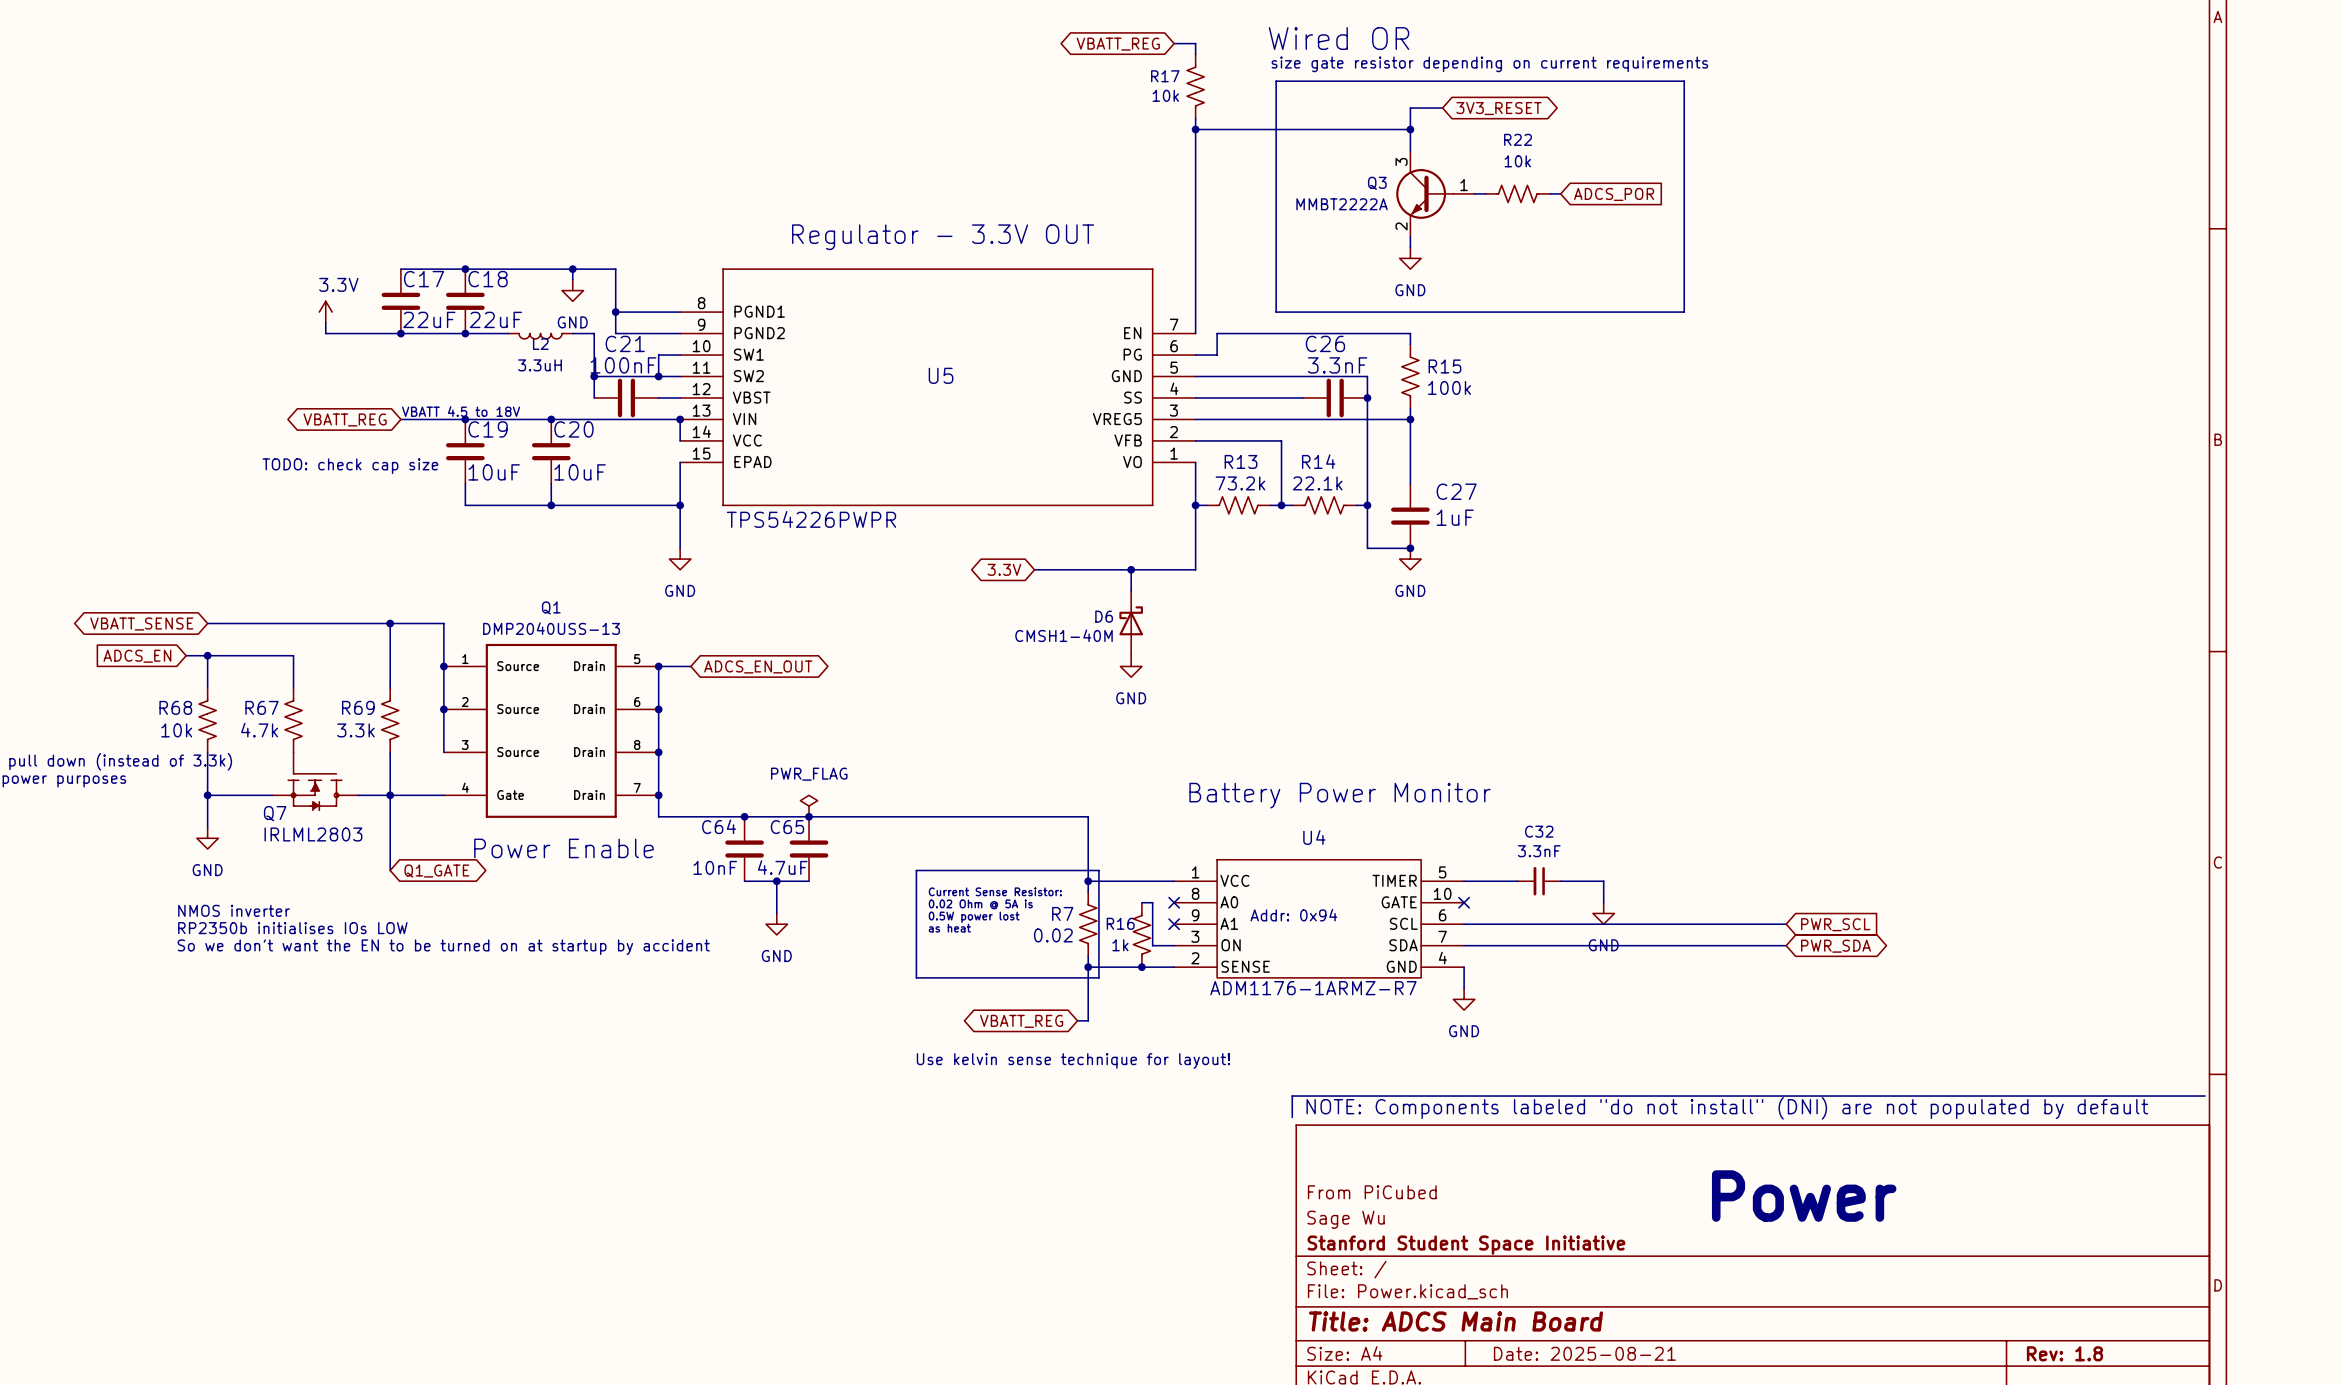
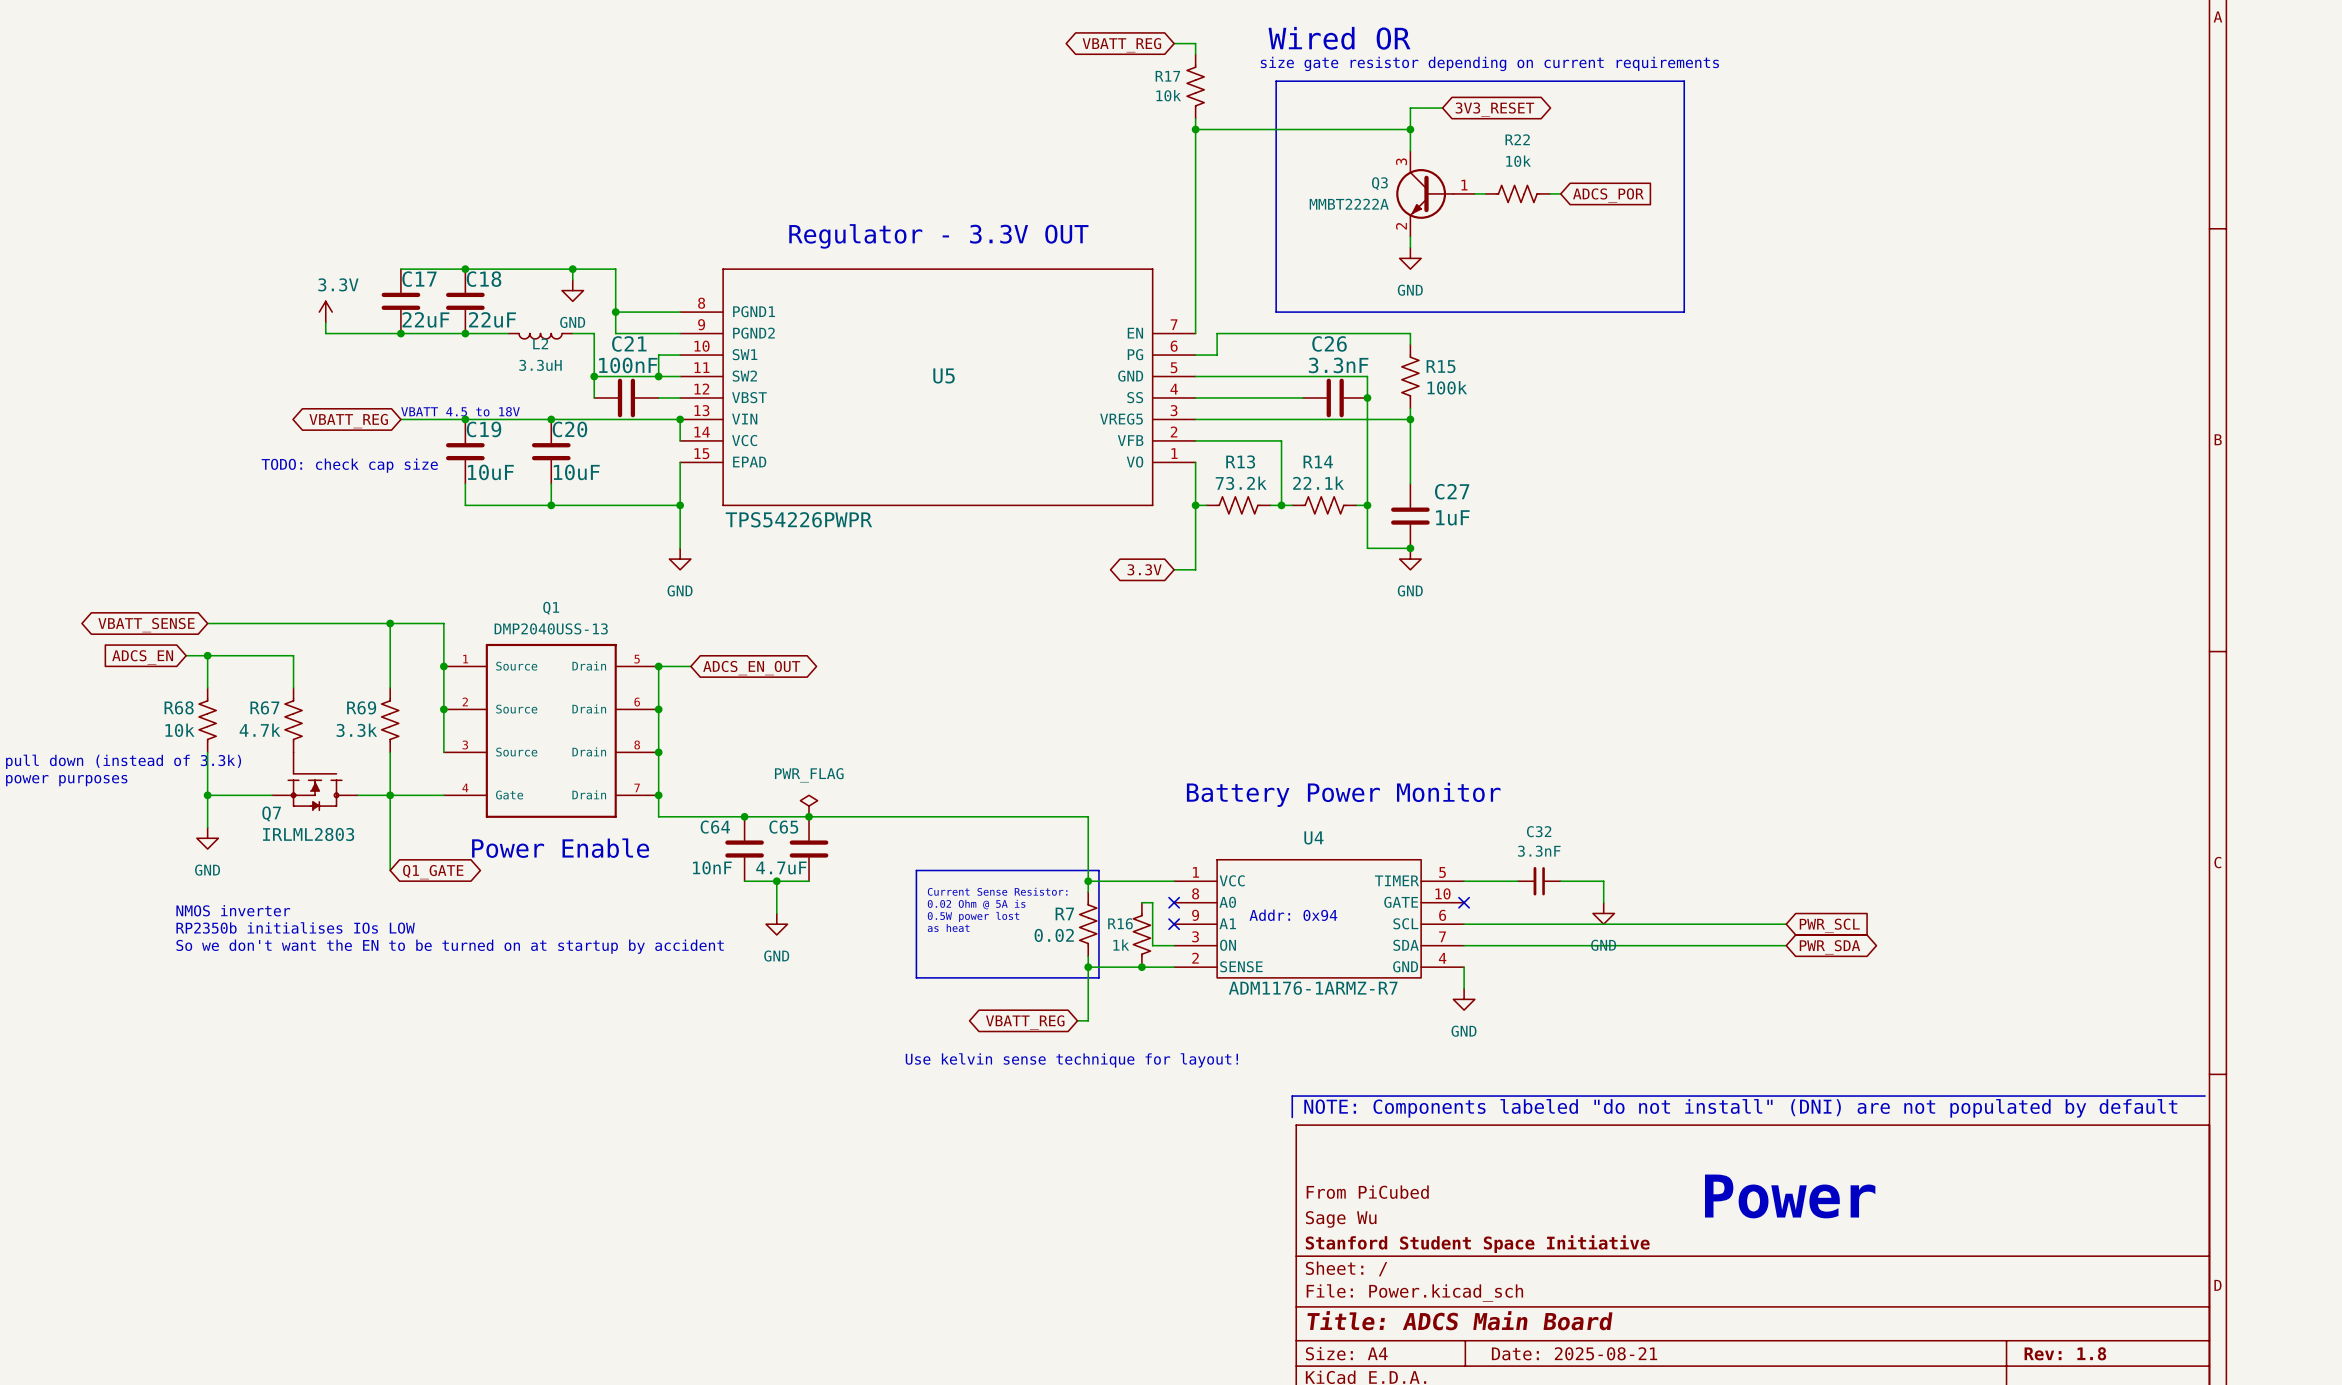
global label position: 3.3V (1004, 569) -> 3.3V (1144, 569)
wire: (1034, 569) (1174, 569) -> none
wire: (1131, 569) (1131, 591) -> none
junction: (1131, 569) -> none
D6: CMSH1-40M (1131, 623) -> none
power symbol: GND (1131, 666) -> none

